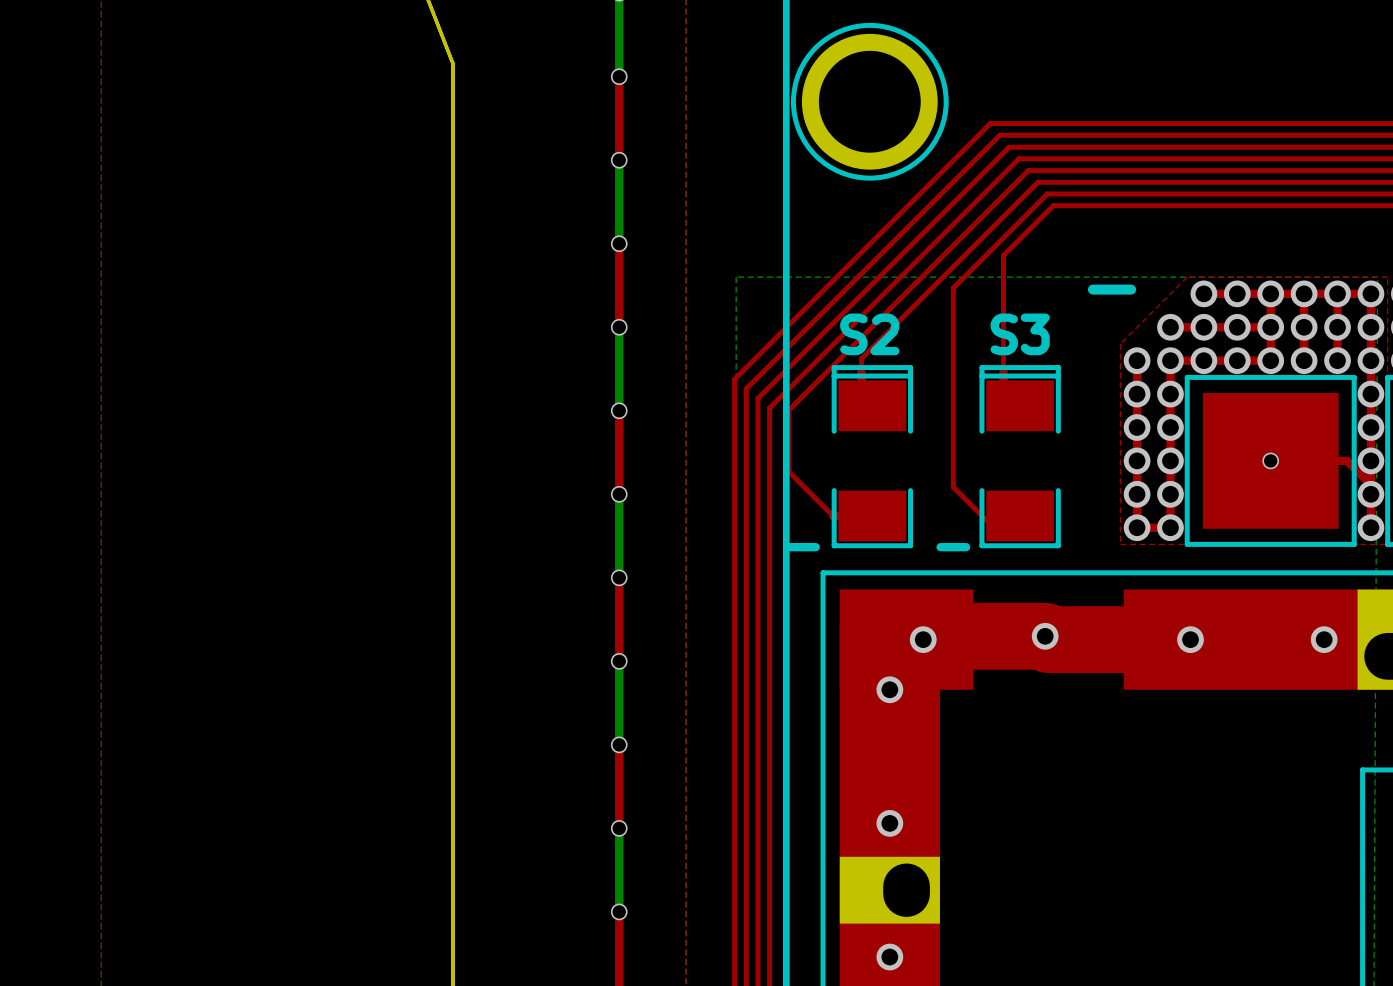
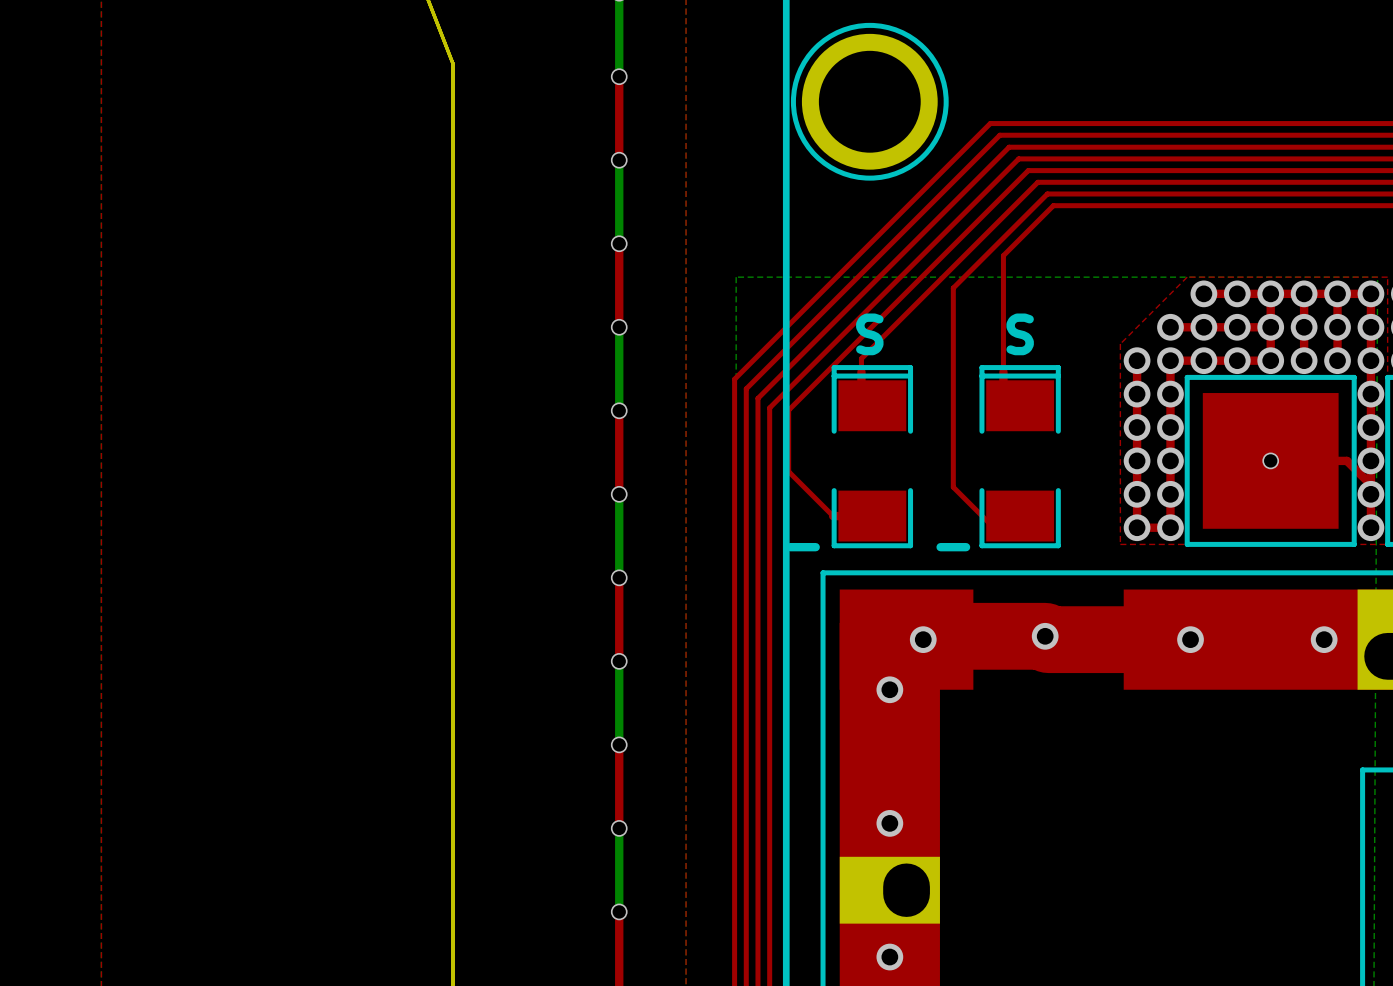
text: - (1112, 289) -> none
text: S2 (869, 334) -> S (869, 334)
text: S3 (1020, 334) -> S (1020, 334)

